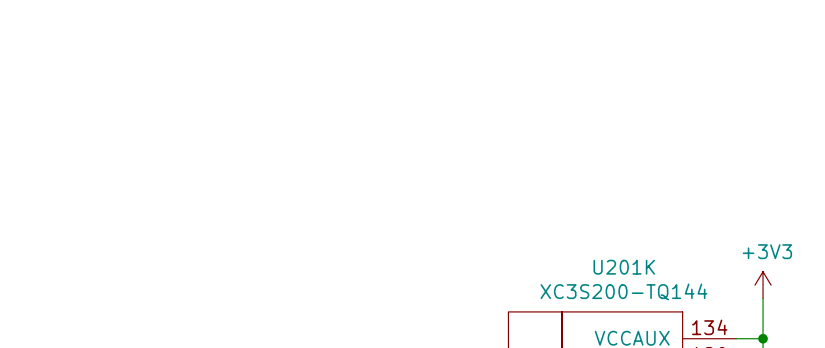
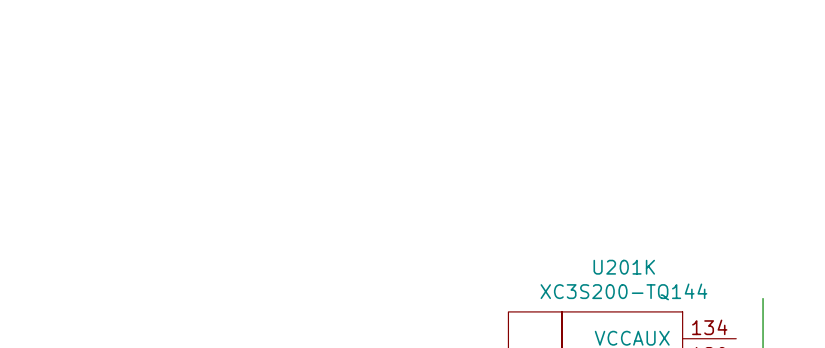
power symbol: +3V3 (763, 285) -> none
wire: (736, 338) (763, 338) -> none
junction: (763, 338) -> none

